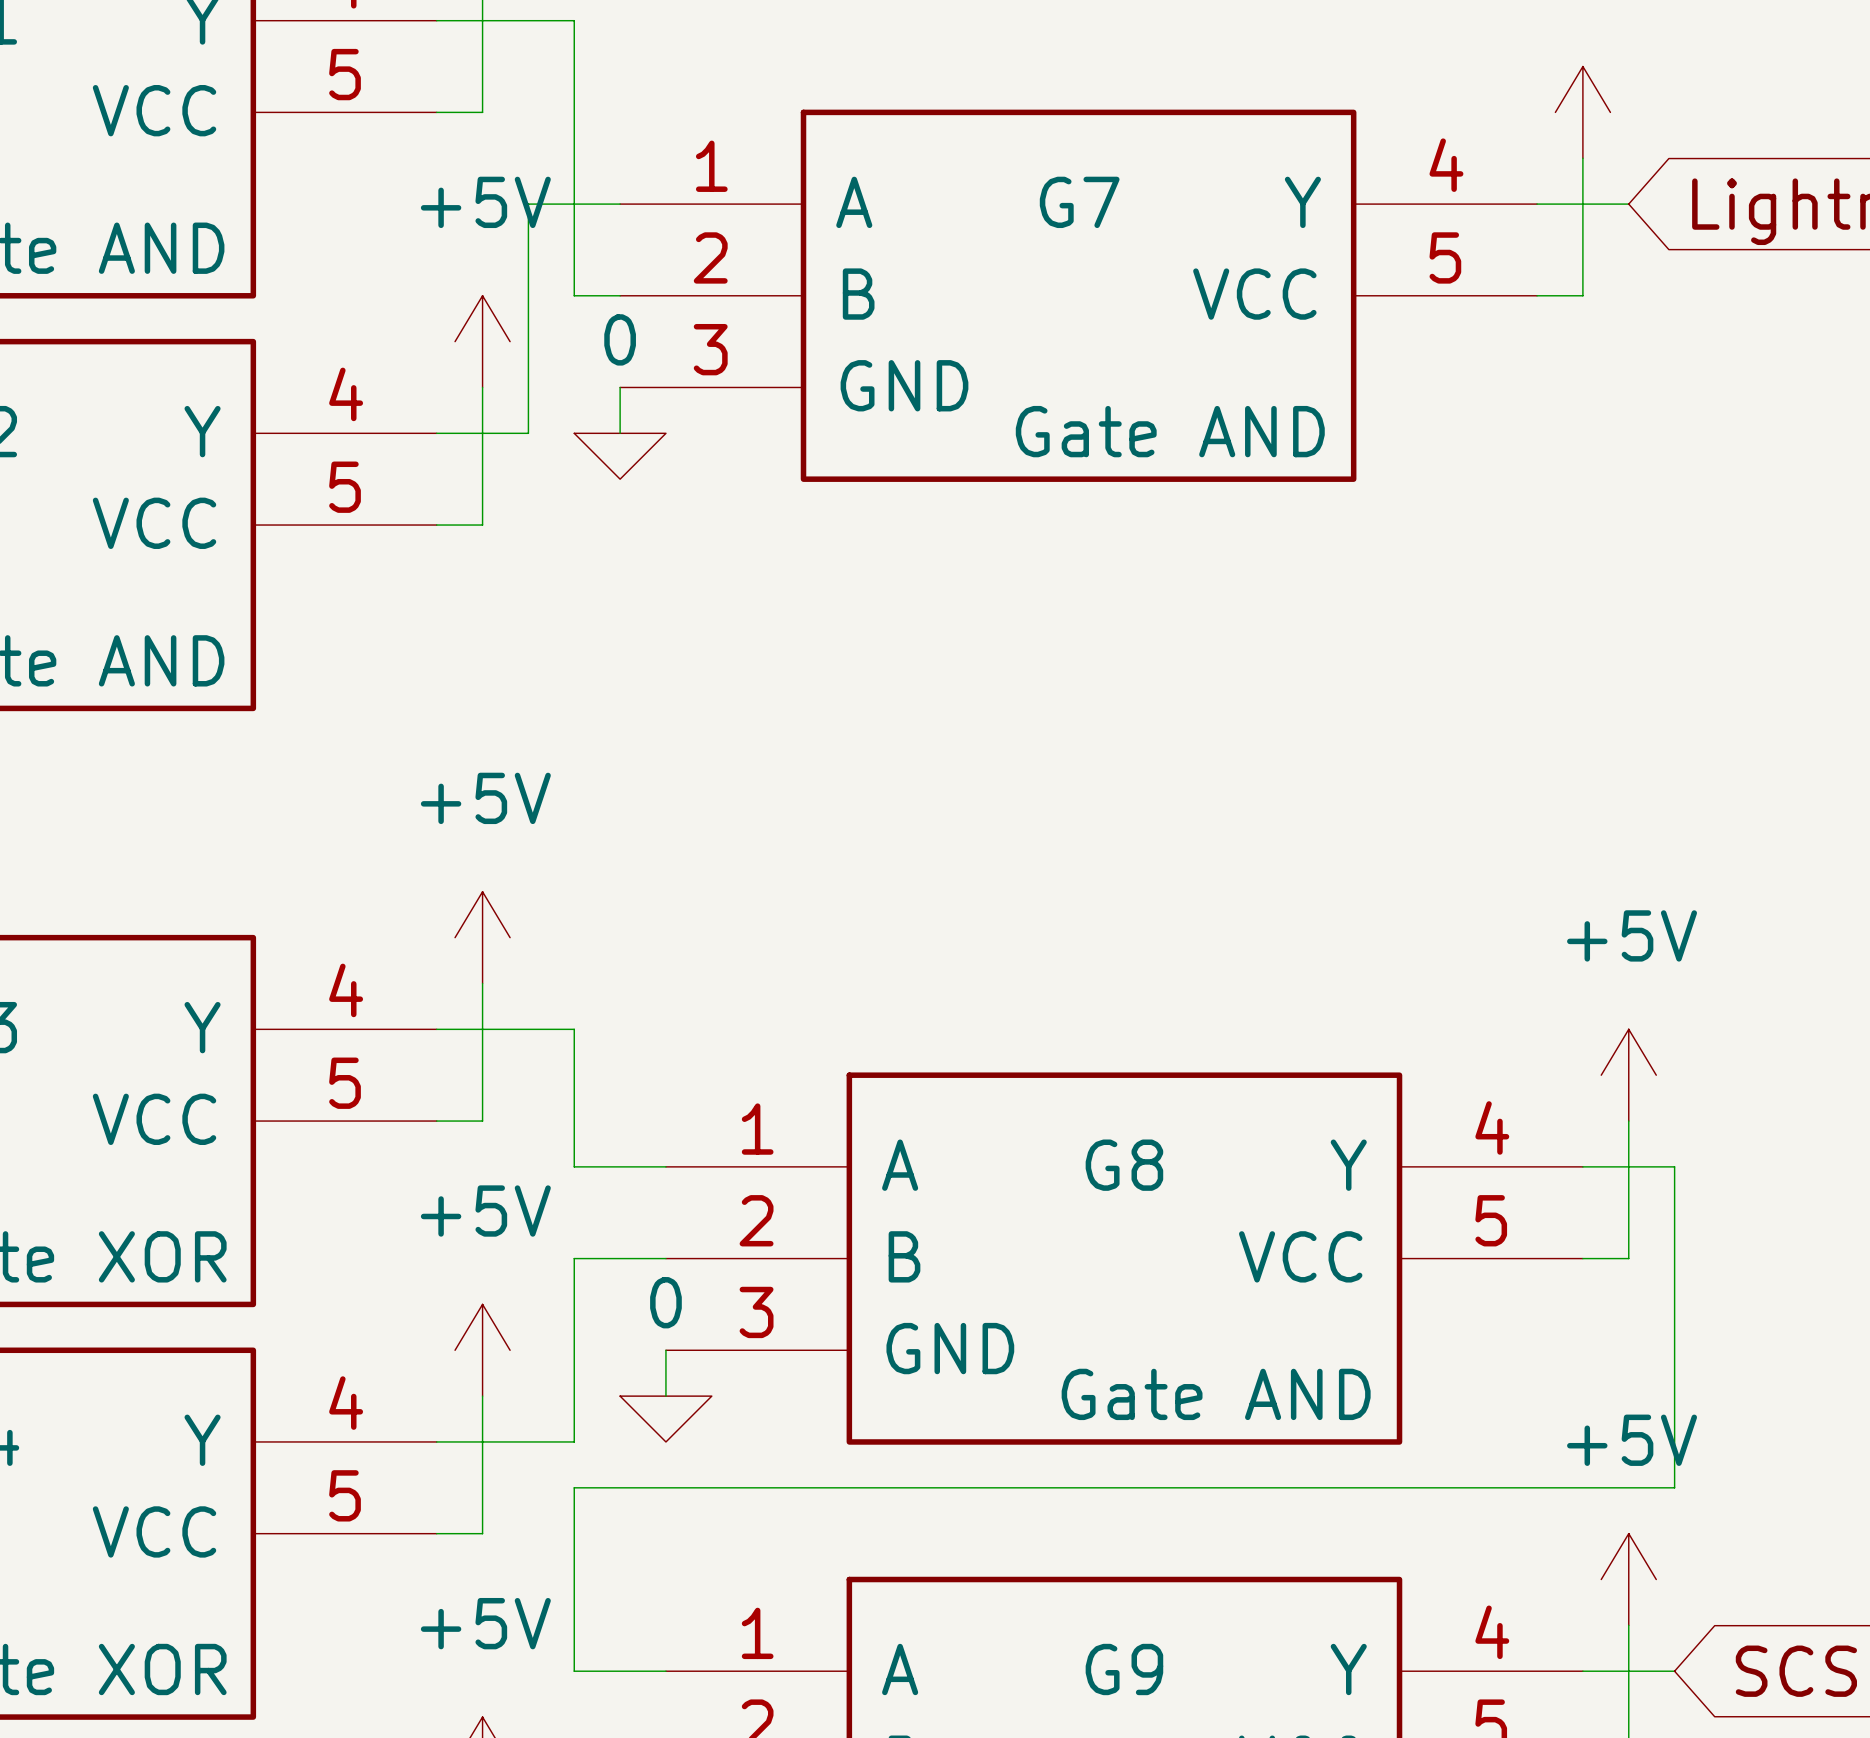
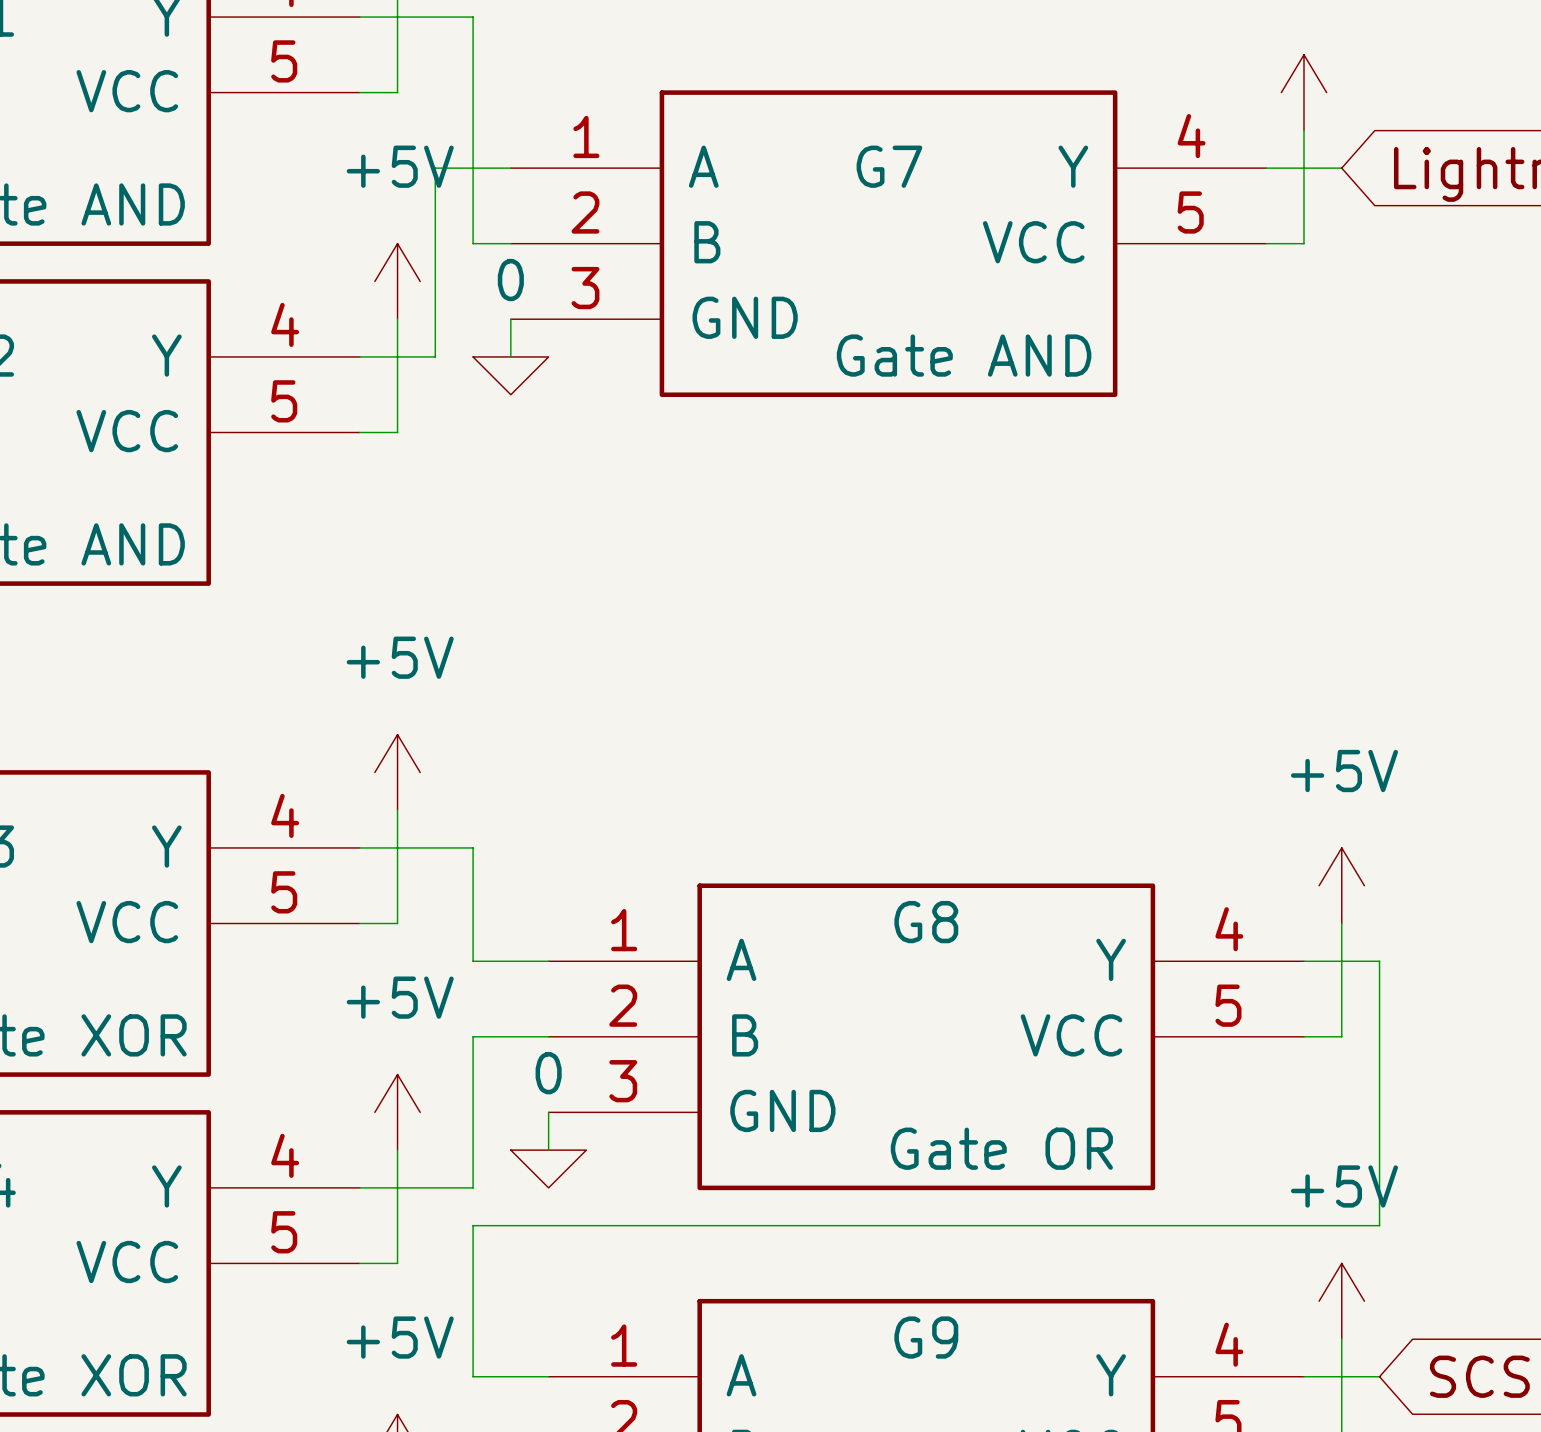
G8 name position: G8 (1124, 1165) -> G8 (926, 922)
G8 text: Gate AND (1216, 1394) -> Gate OR (1001, 1148)
G9 name position: G9 (1124, 1669) -> G9 (926, 1337)

